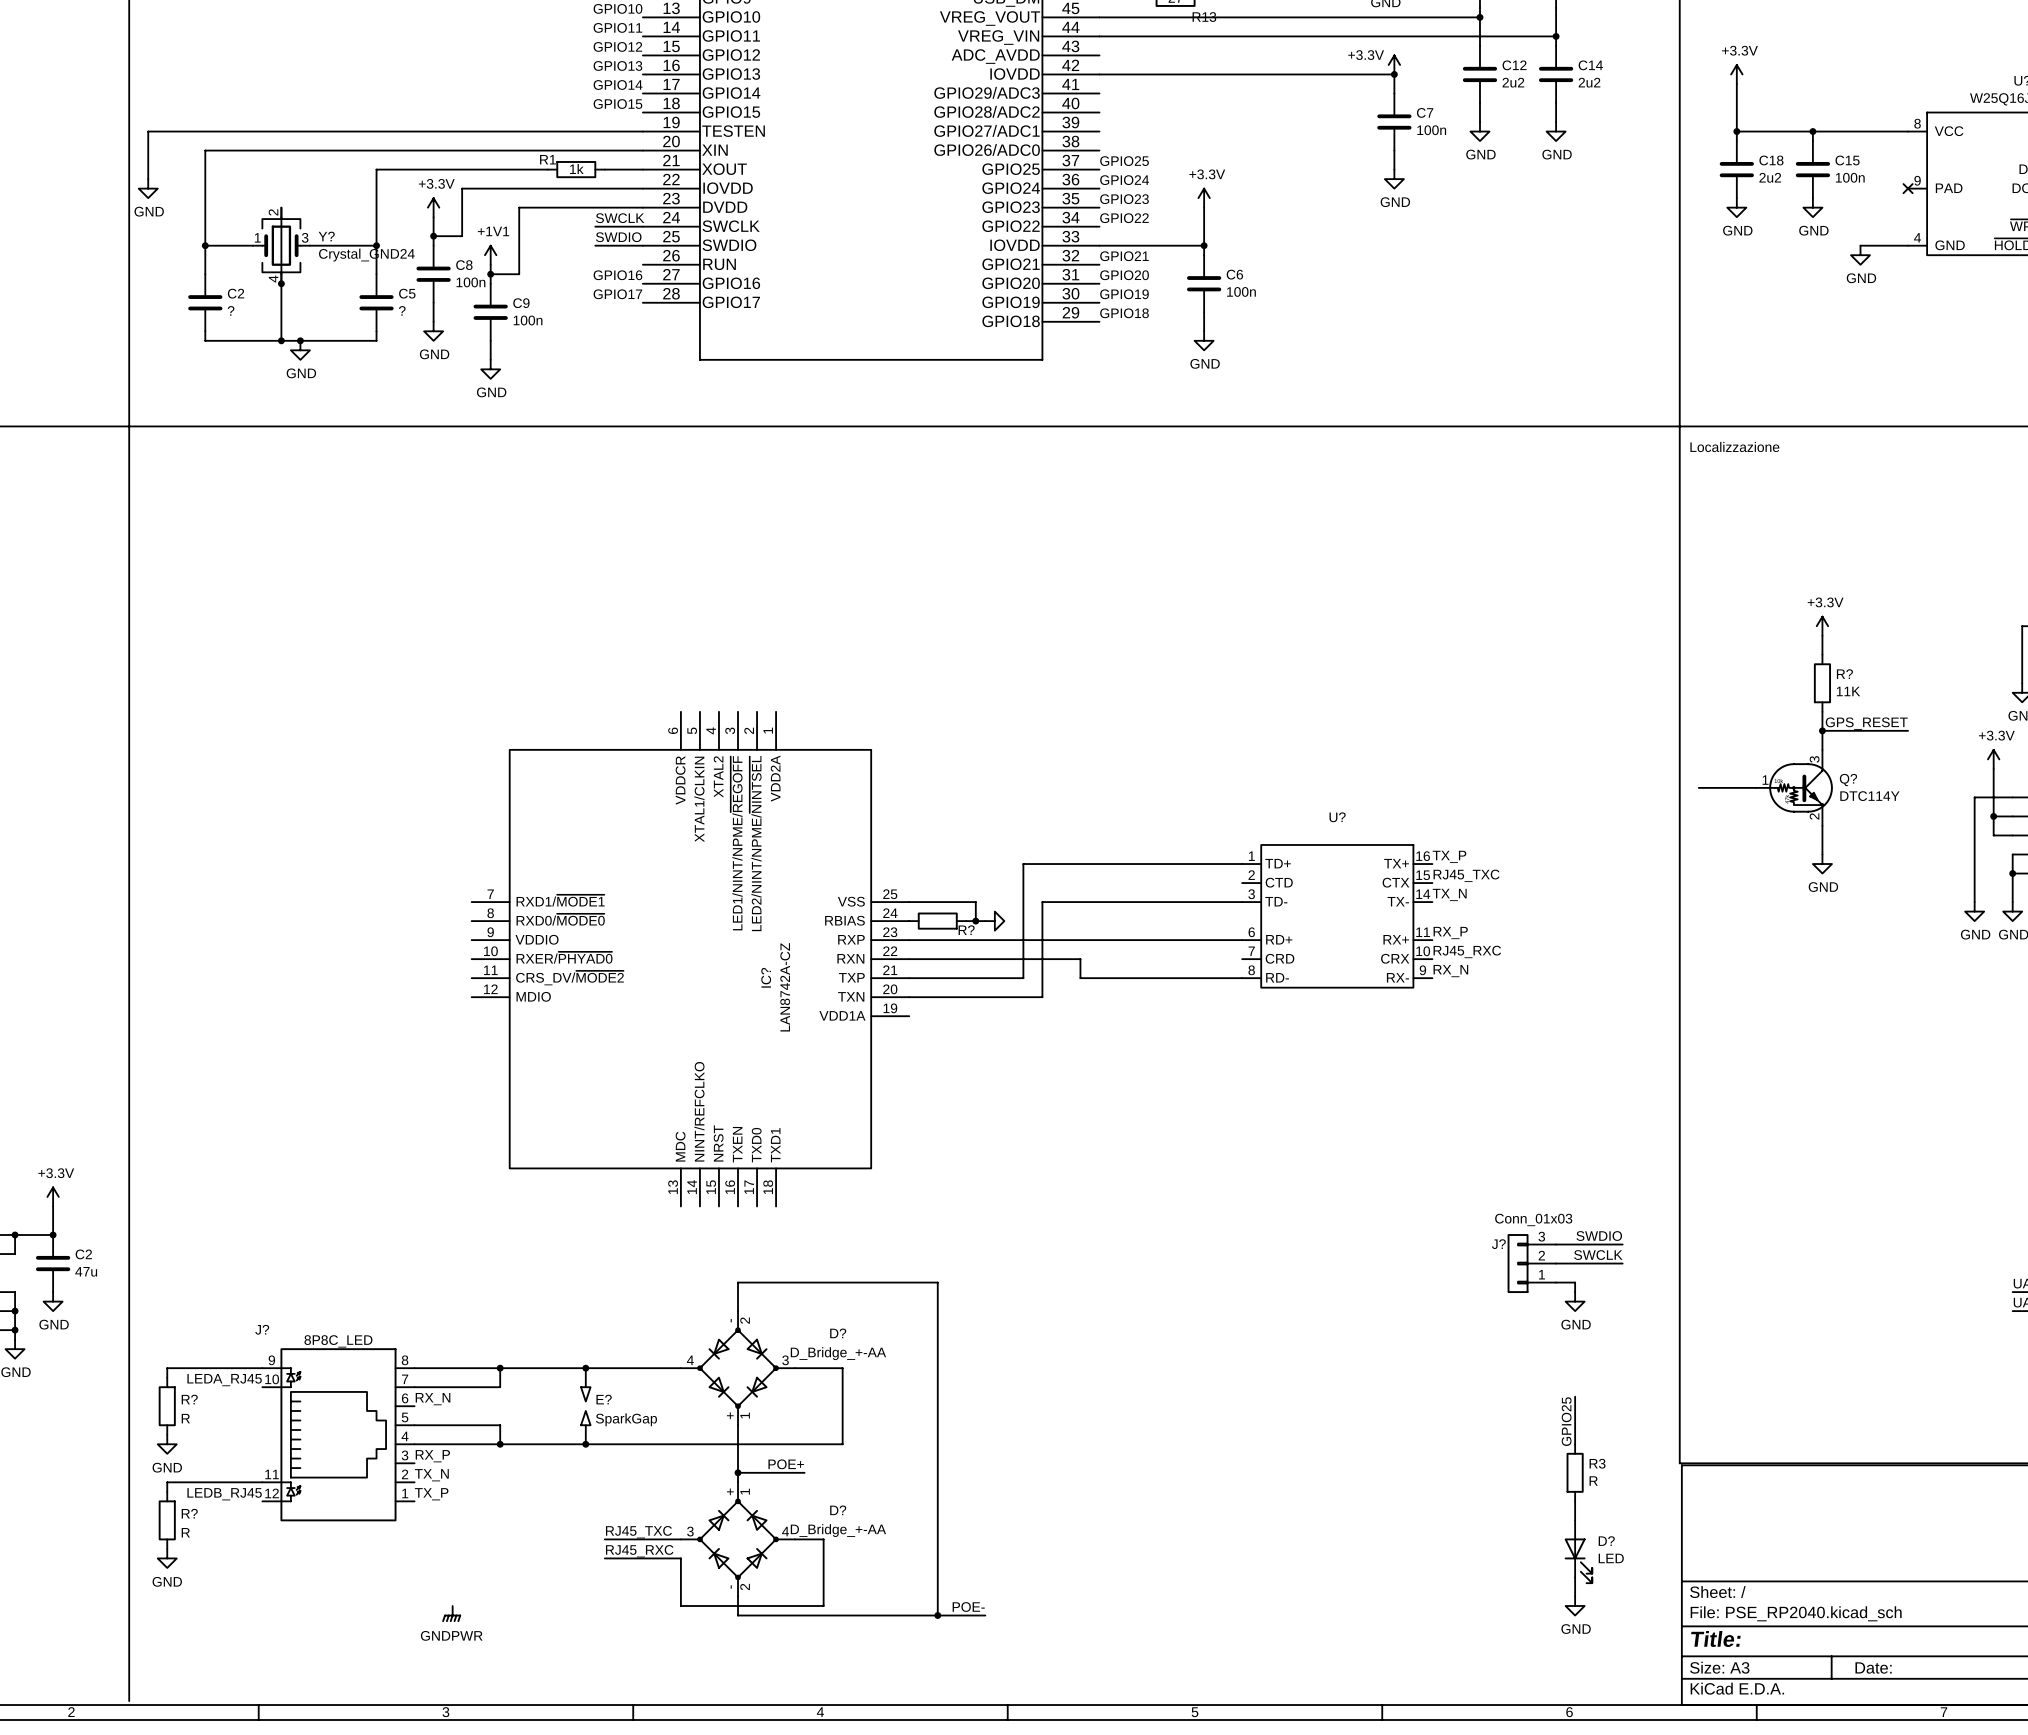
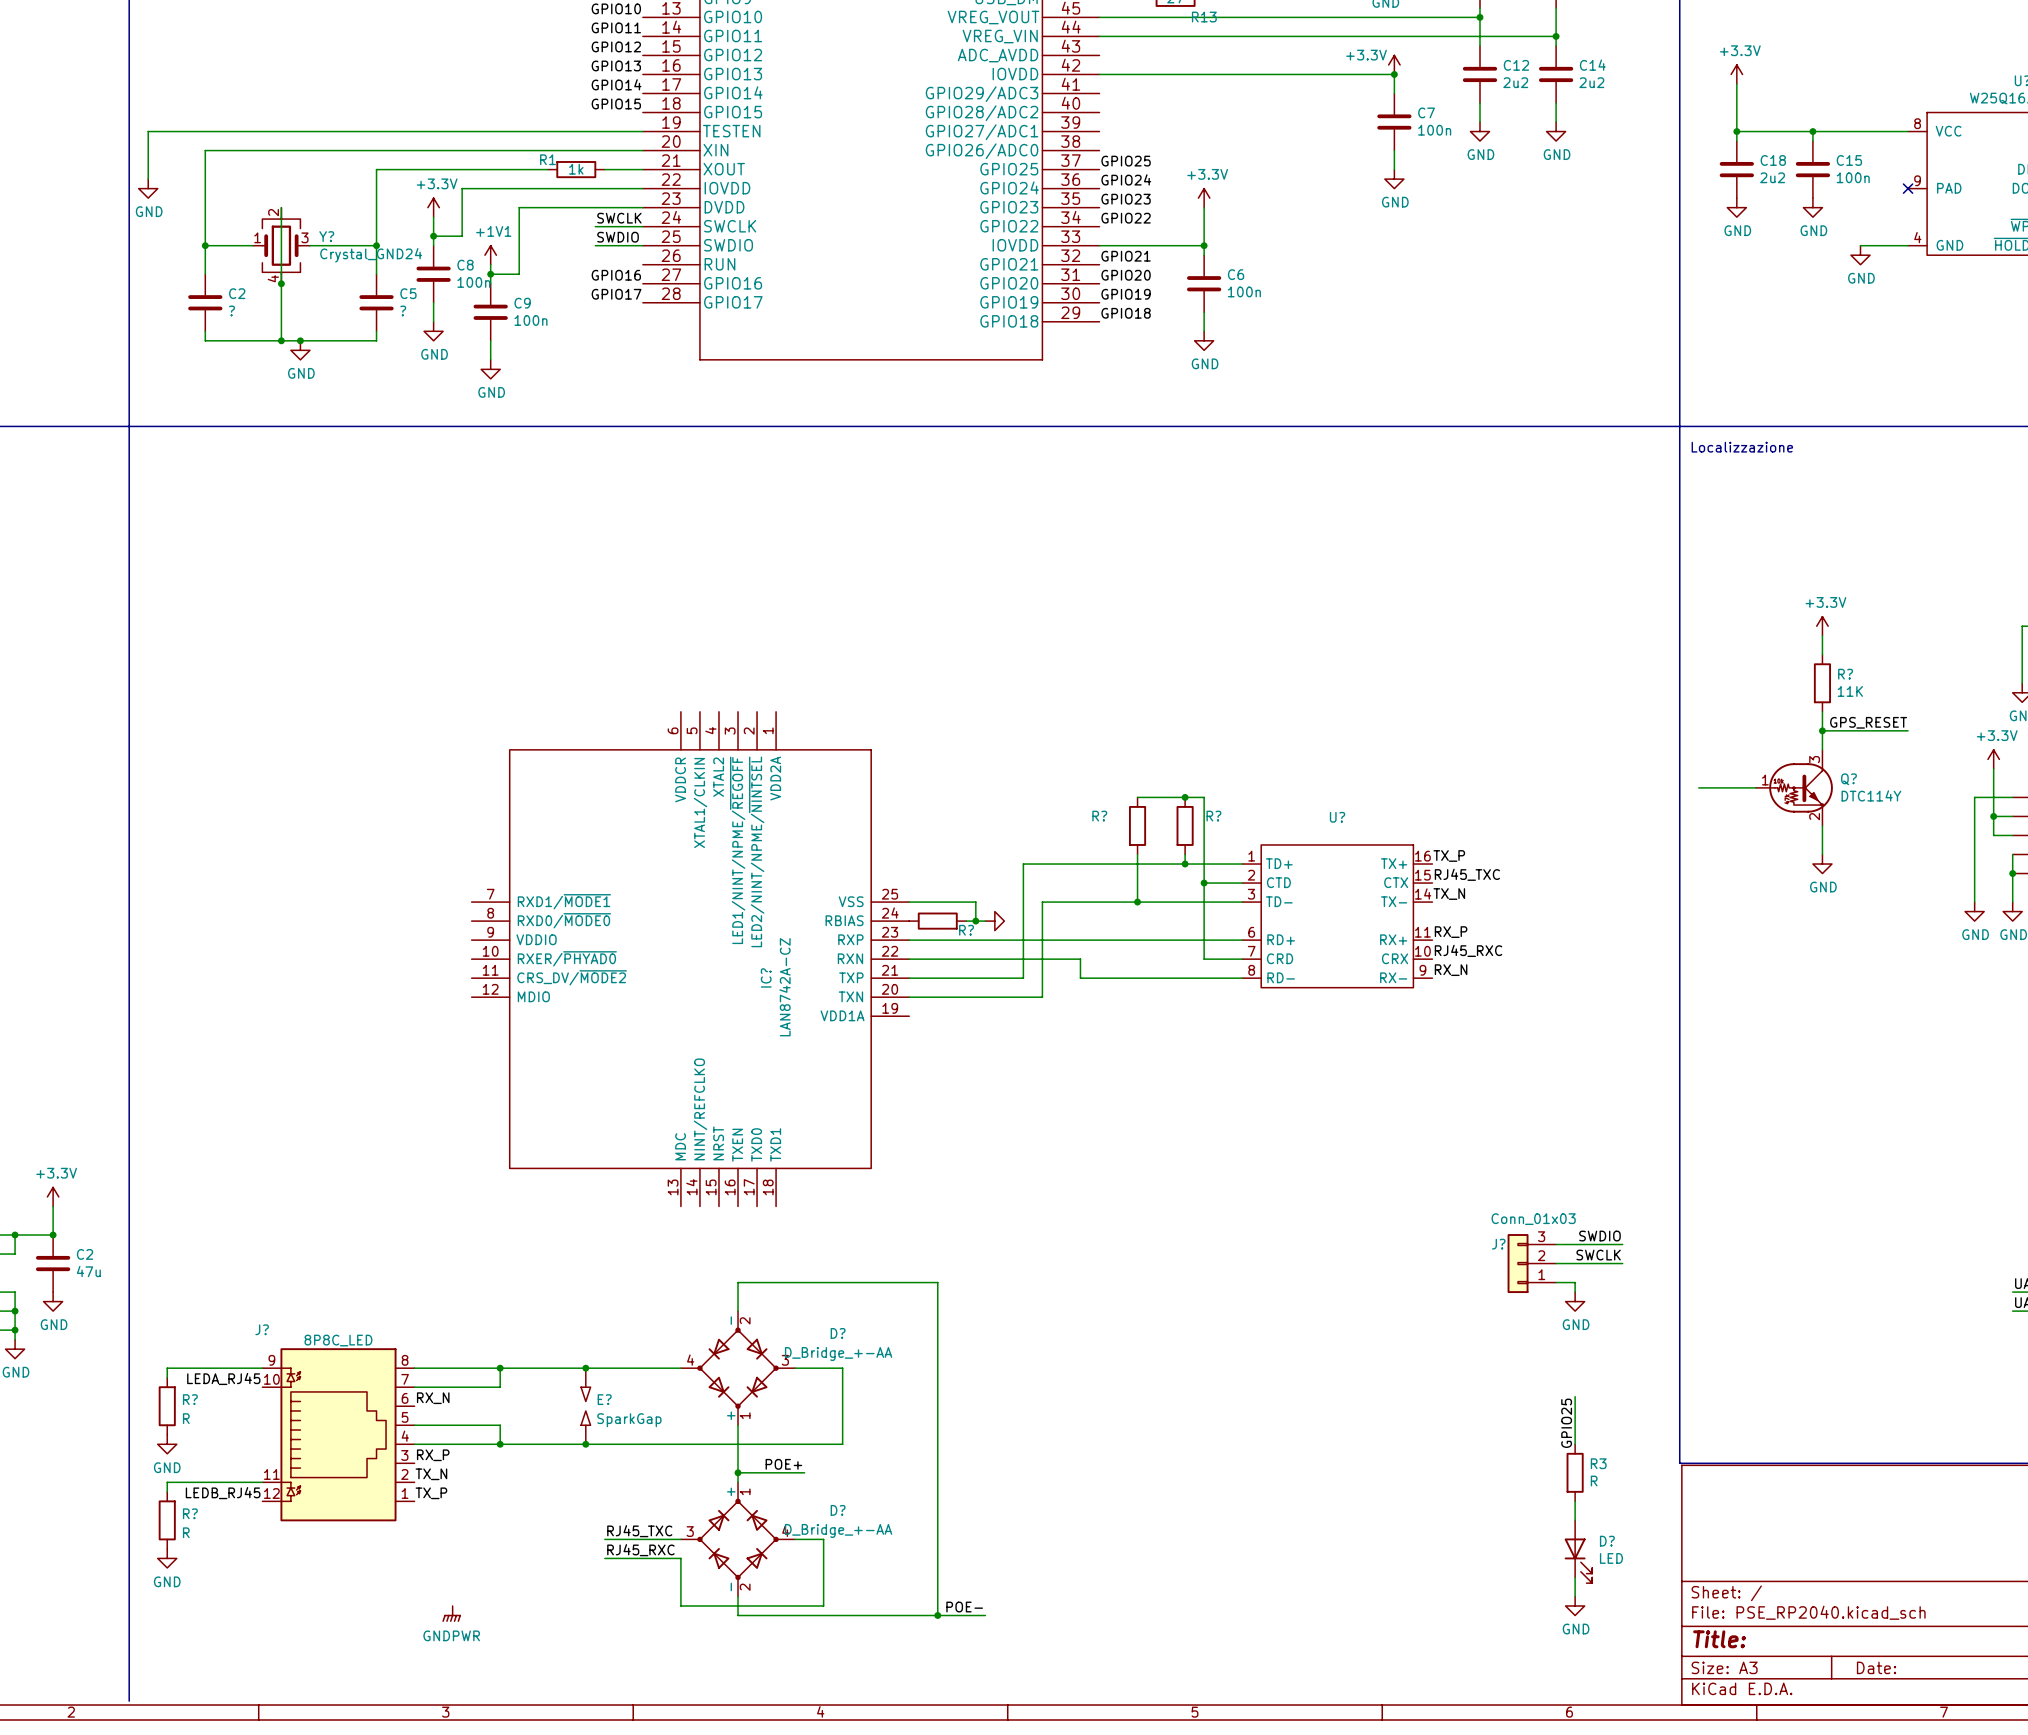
wire: none -> (1137, 797) (1204, 797) (1204, 959) (1242, 959)
junction: none -> (1185, 797)
R?: none -> (1137, 825)
R?: none -> (1185, 825)
wire: none -> (1137, 854) (1137, 902)
wire: none -> (1185, 854) (1185, 864)
junction: none -> (1185, 864)
wire: none -> (1204, 883) (1242, 883)
junction: none -> (1204, 883)
junction: none -> (1137, 902)

